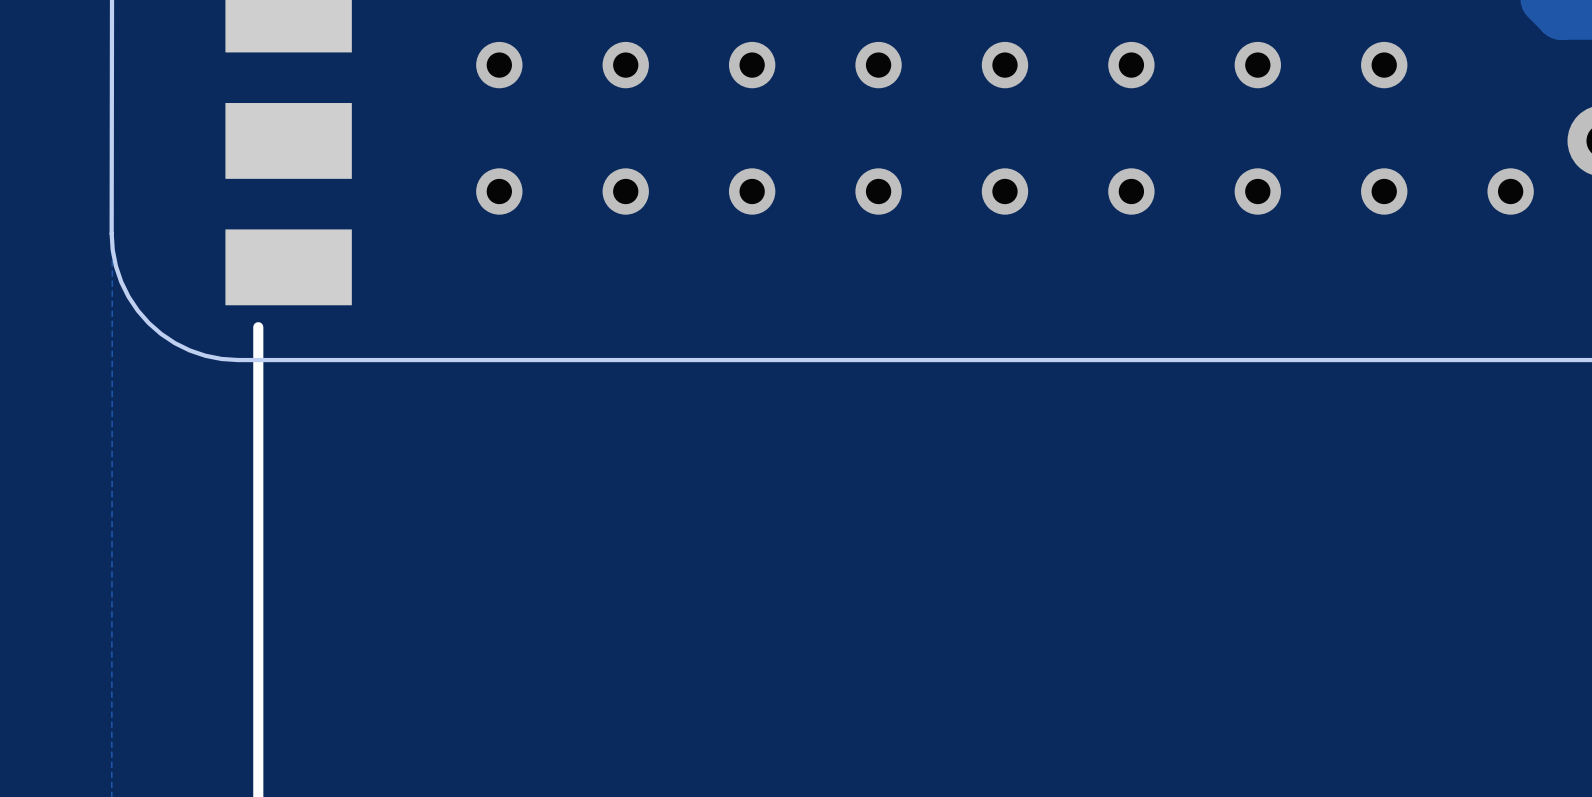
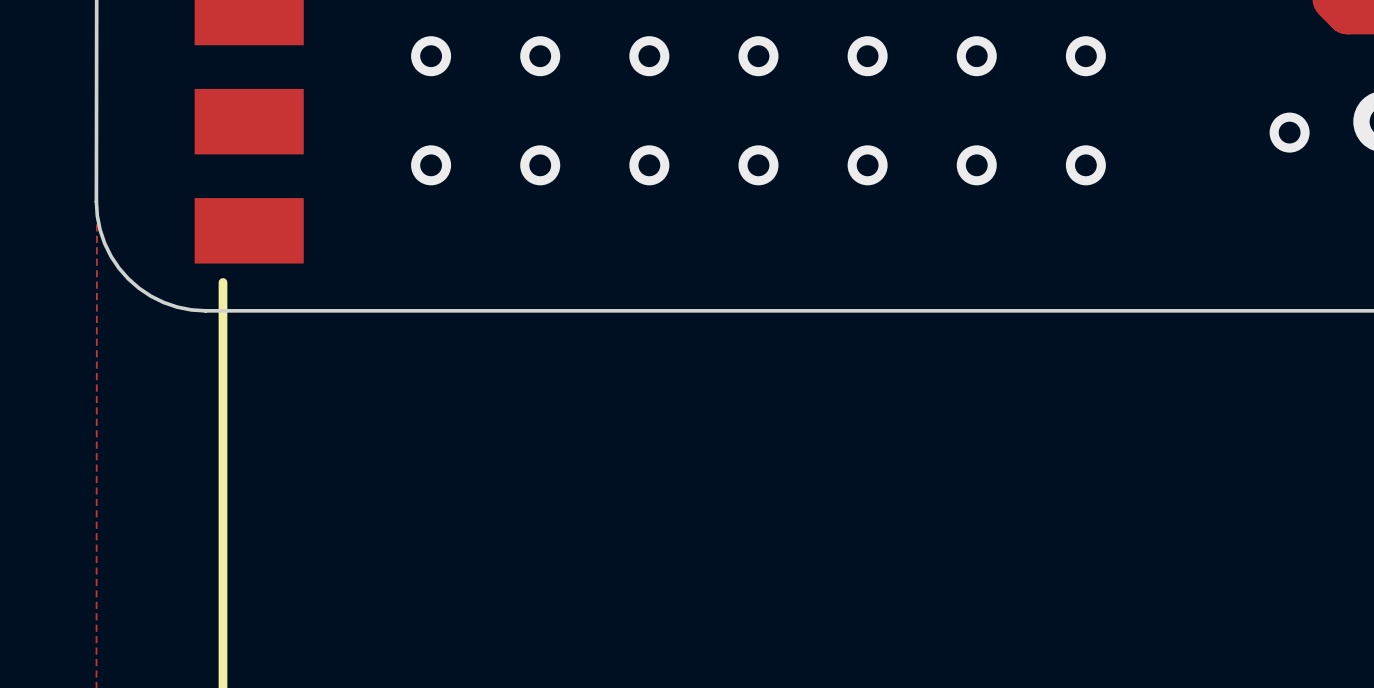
via: (1384, 65) -> none
via: (1384, 191) -> none
via position: (1510, 191) -> (1289, 132)

